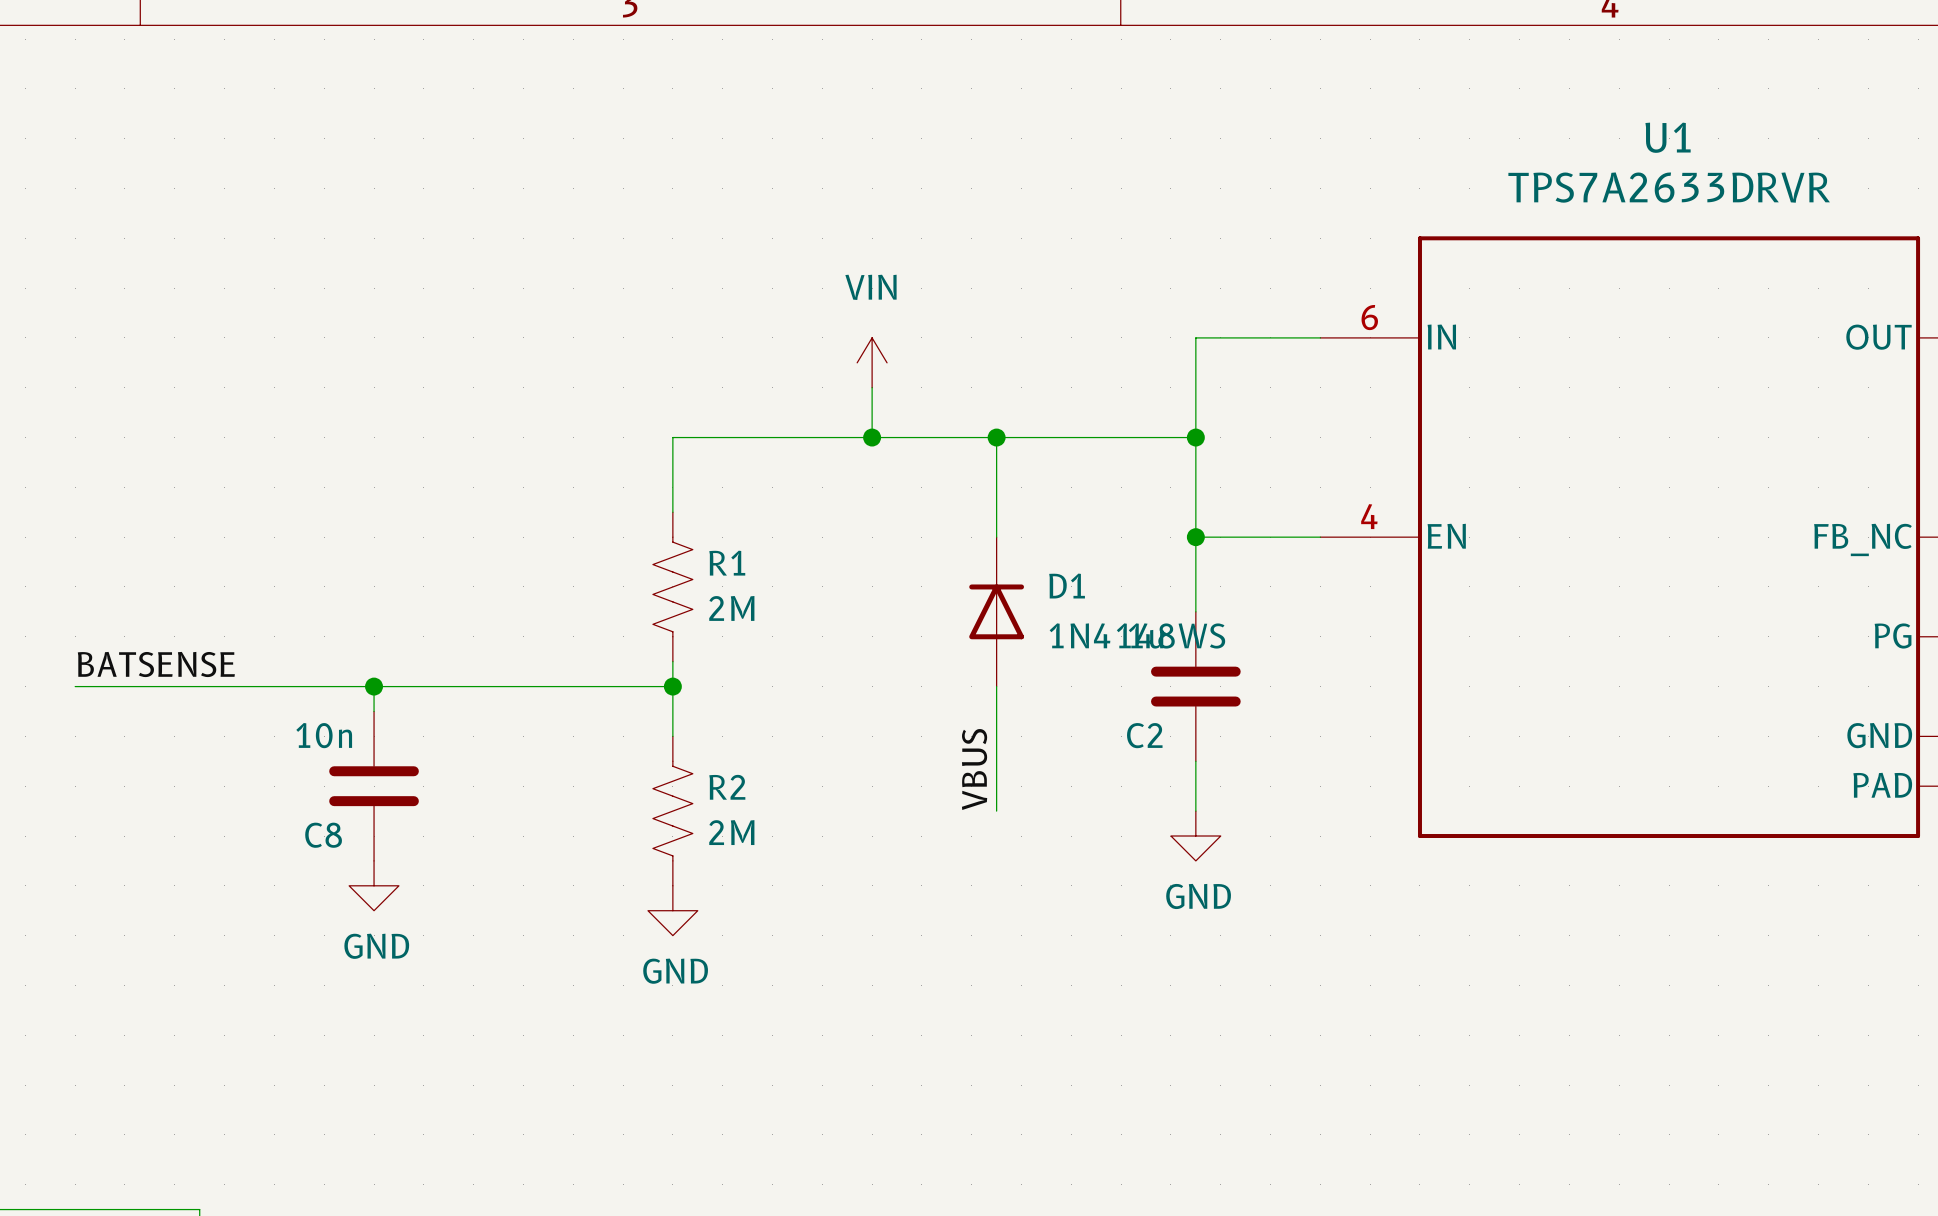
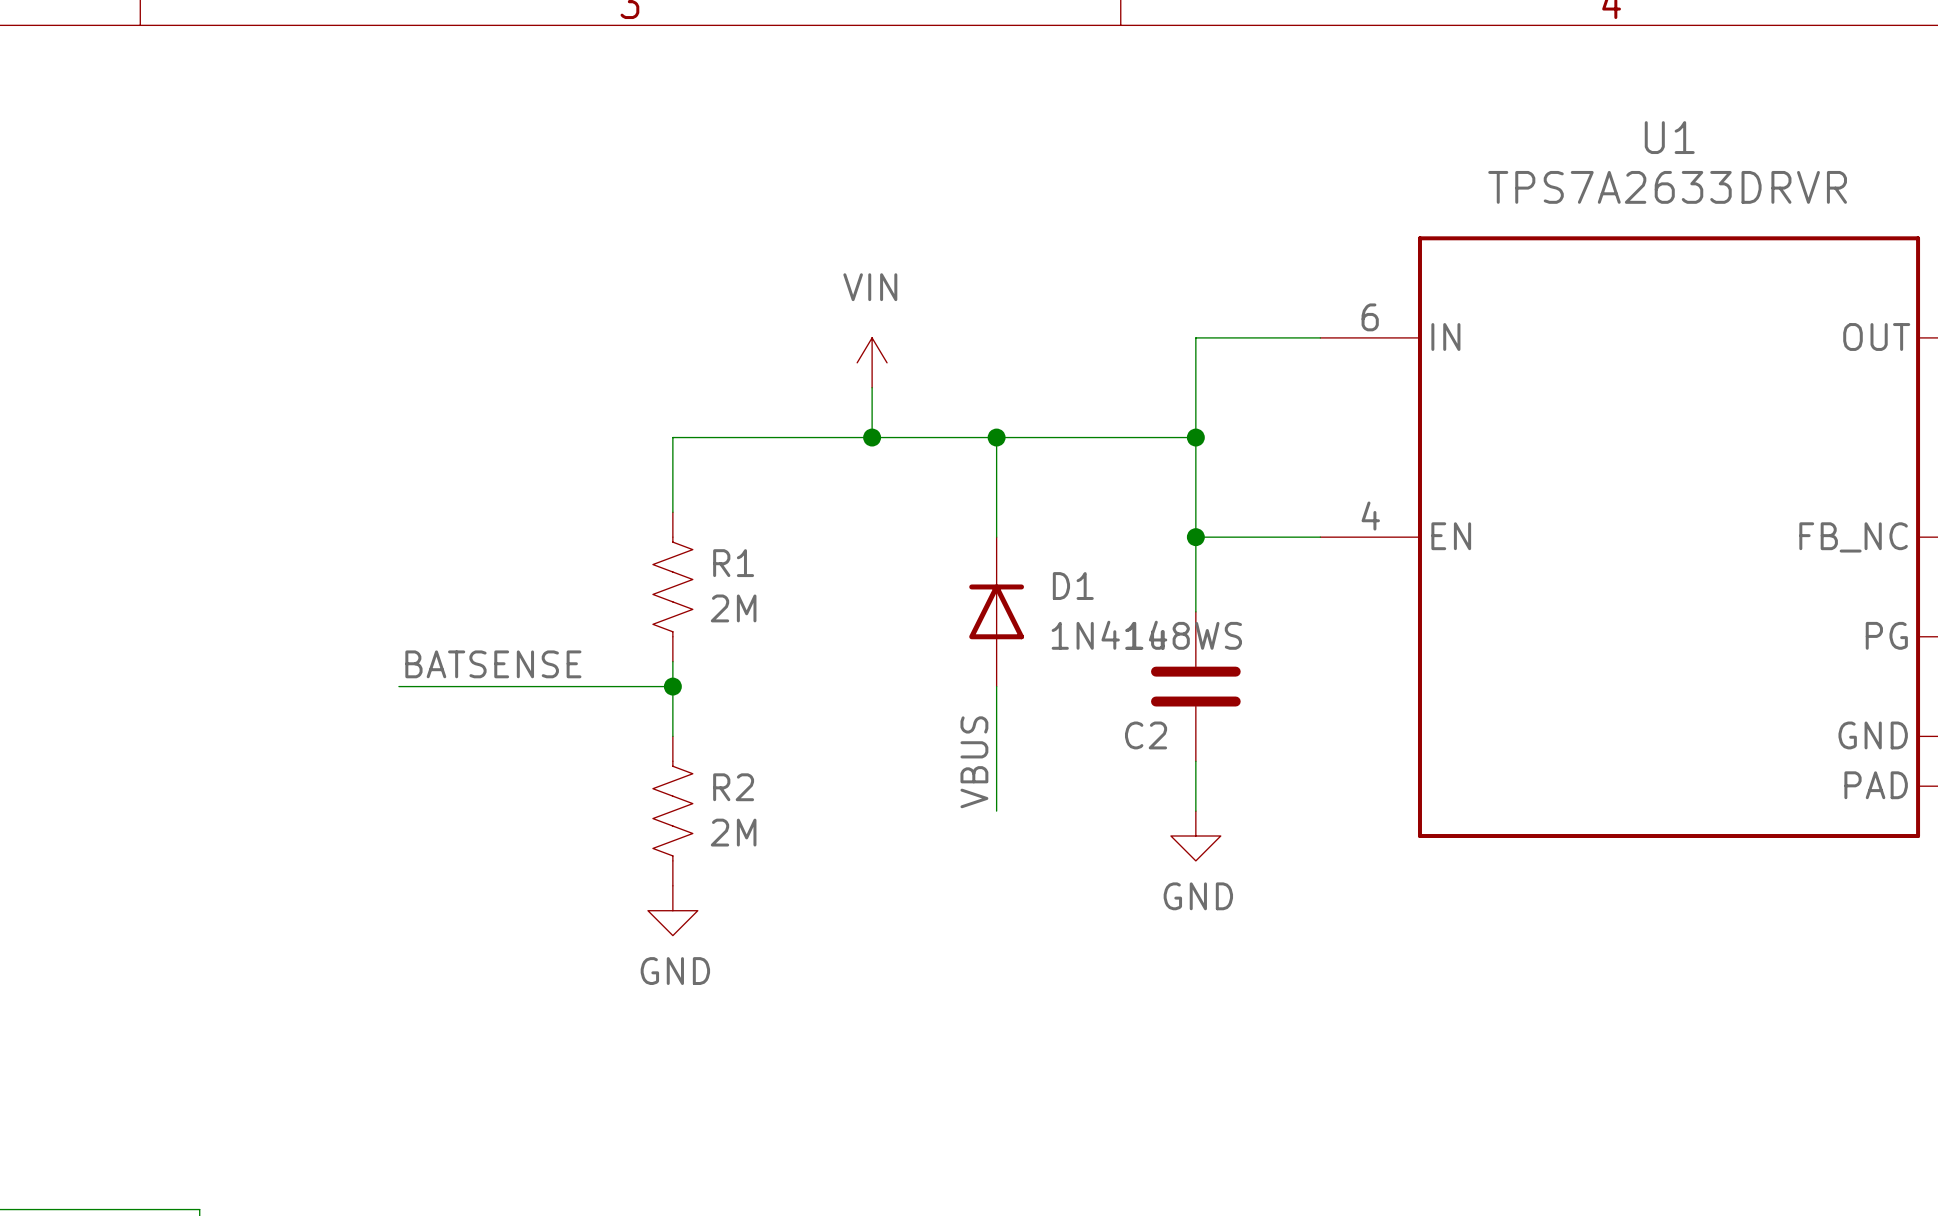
label position: BATSENSE (156, 664) -> BATSENSE (493, 664)
wire: (75, 686) (398, 686) -> none
wire: (374, 686) (374, 711) -> none
junction: (374, 686) -> none
C8: 10n (374, 786) -> none
power symbol: GND (374, 885) -> none

